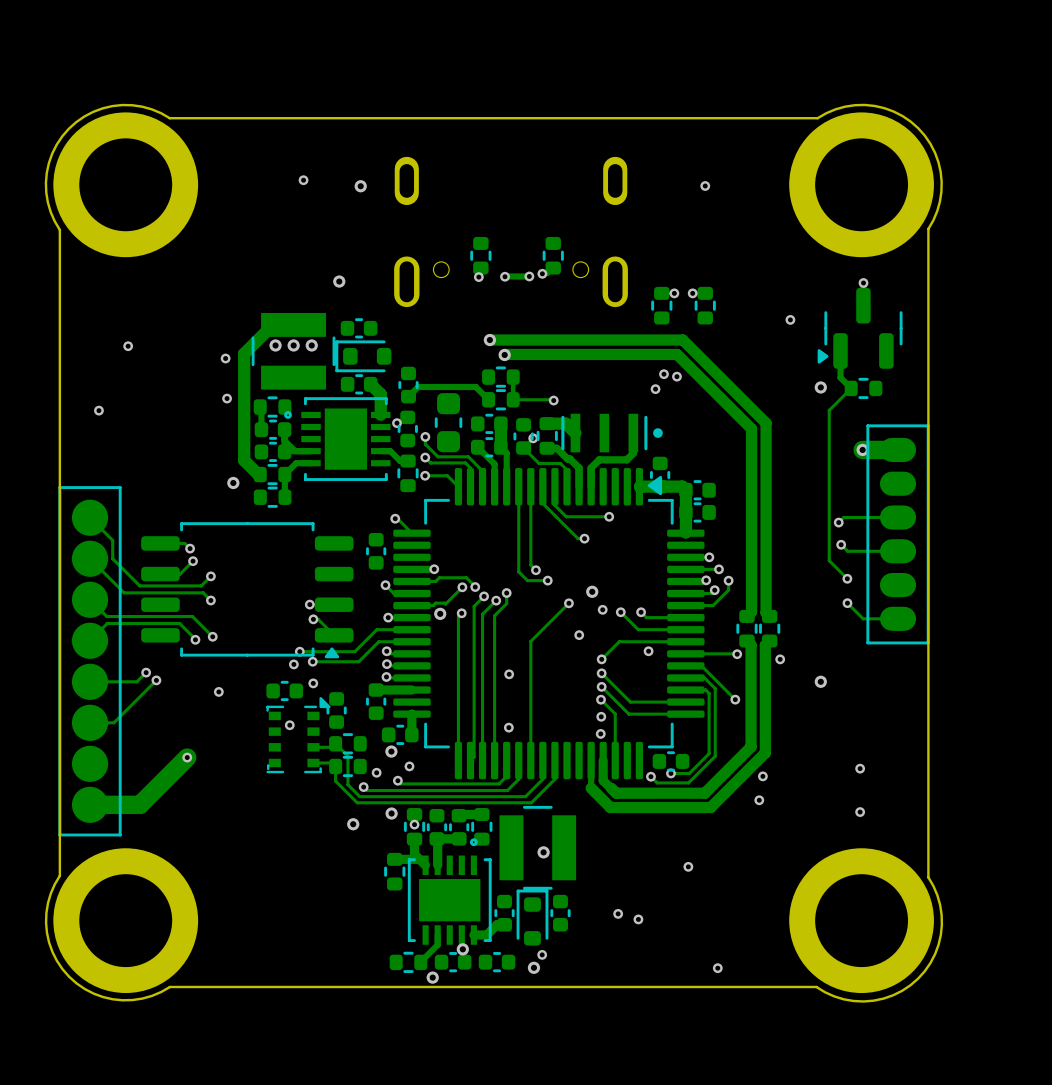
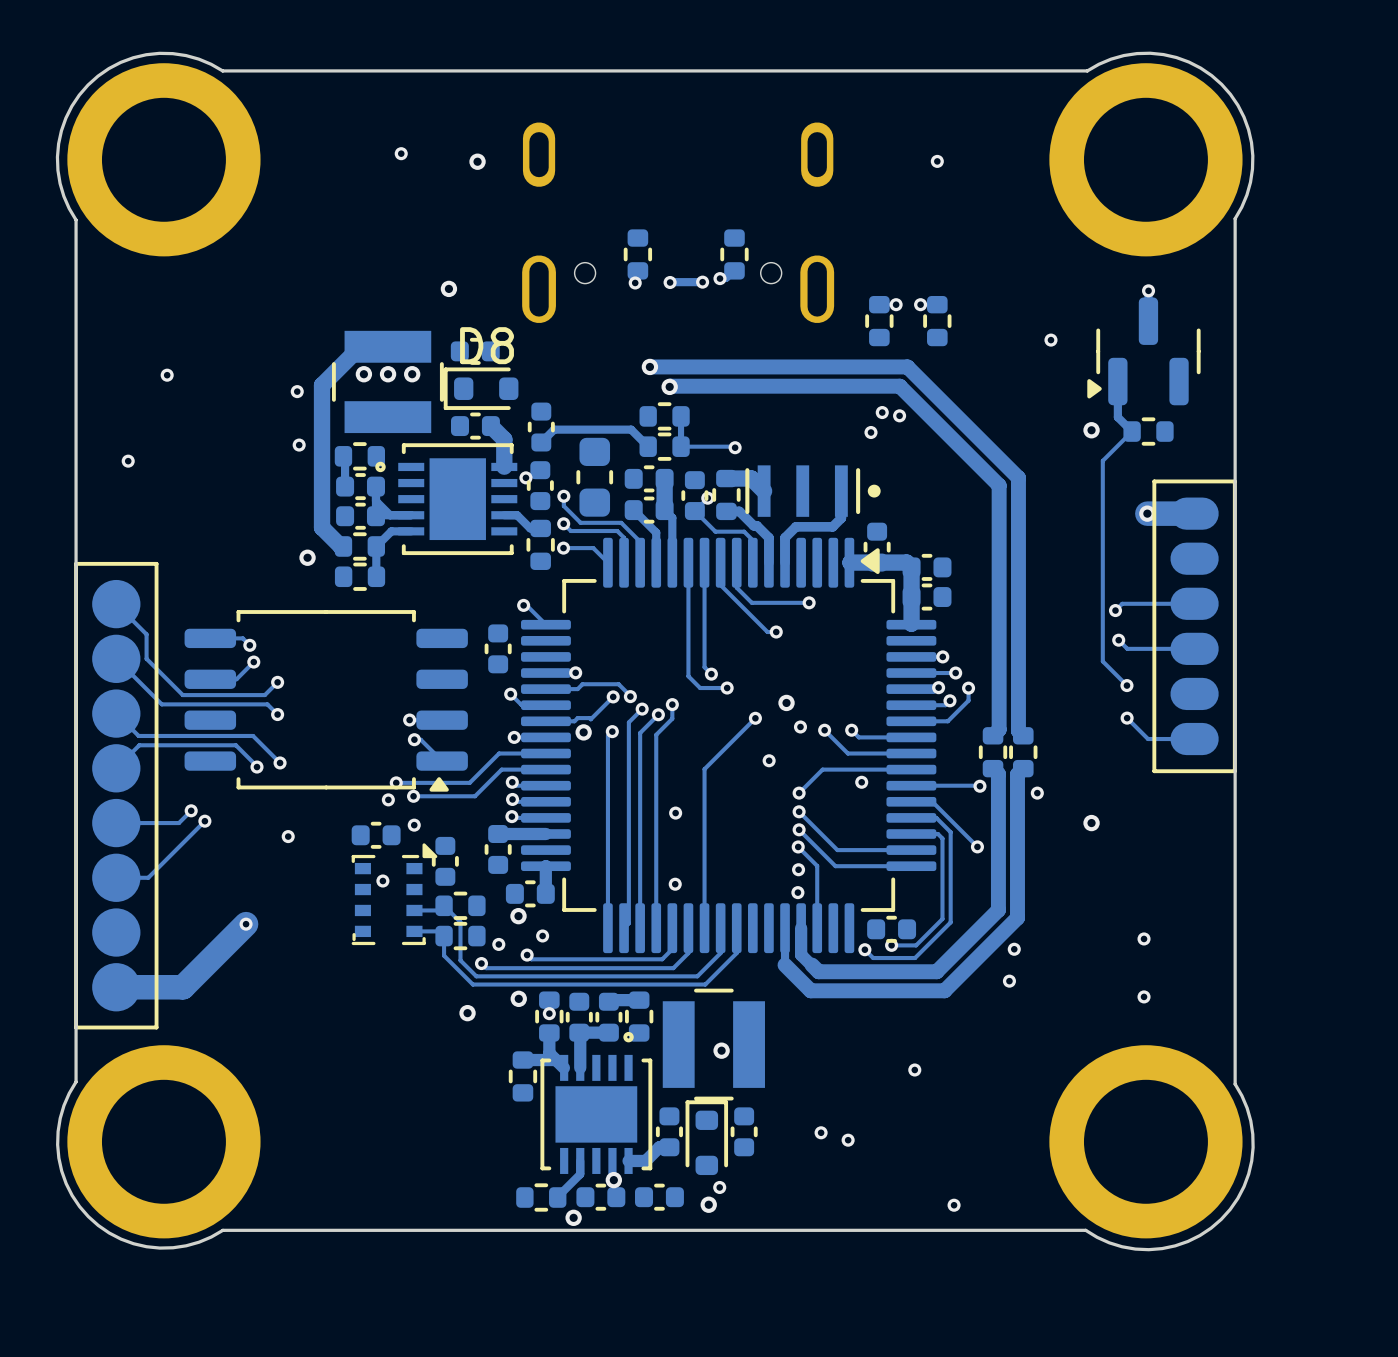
D8 name: none -> D8 (487, 345)

